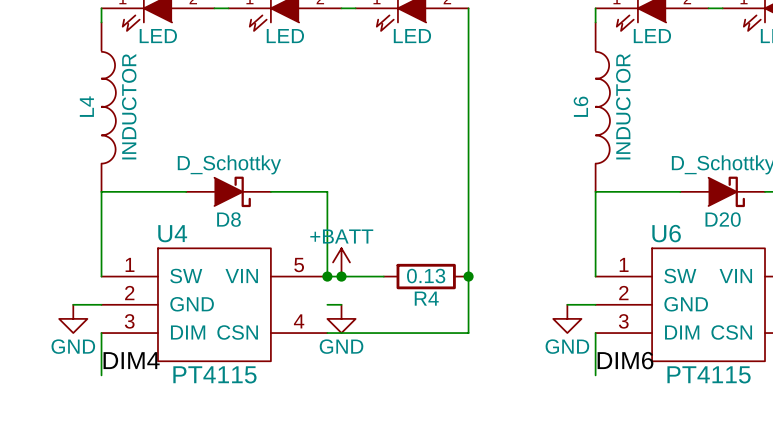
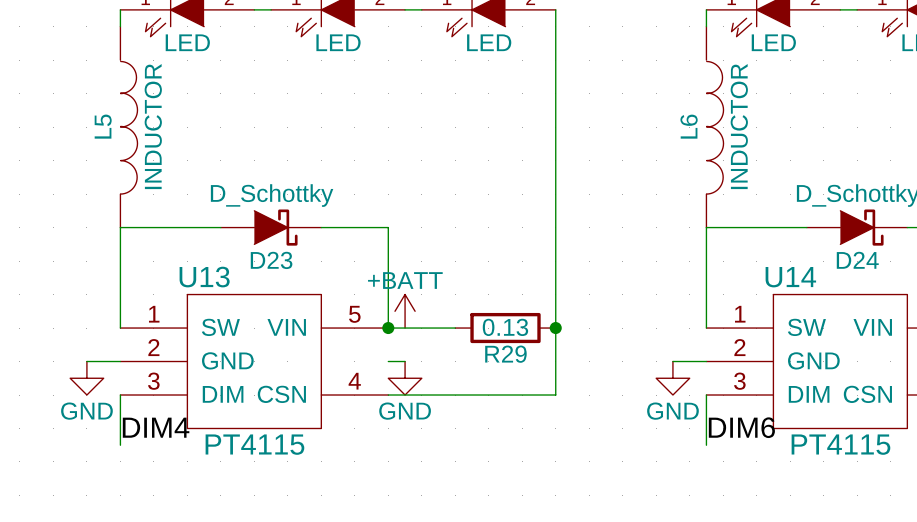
L4 name: L4 (86, 106) -> L5 (103, 126)
D8 name: D8 (228, 219) -> D23 (271, 260)
D20 name: D20 (723, 219) -> D24 (857, 260)
U4 name: U4 (172, 233) -> U13 (204, 277)
U6 name: U6 (666, 233) -> U14 (790, 277)
junction: (341, 276) -> none
R4 name: R4 (426, 298) -> R29 (505, 354)

